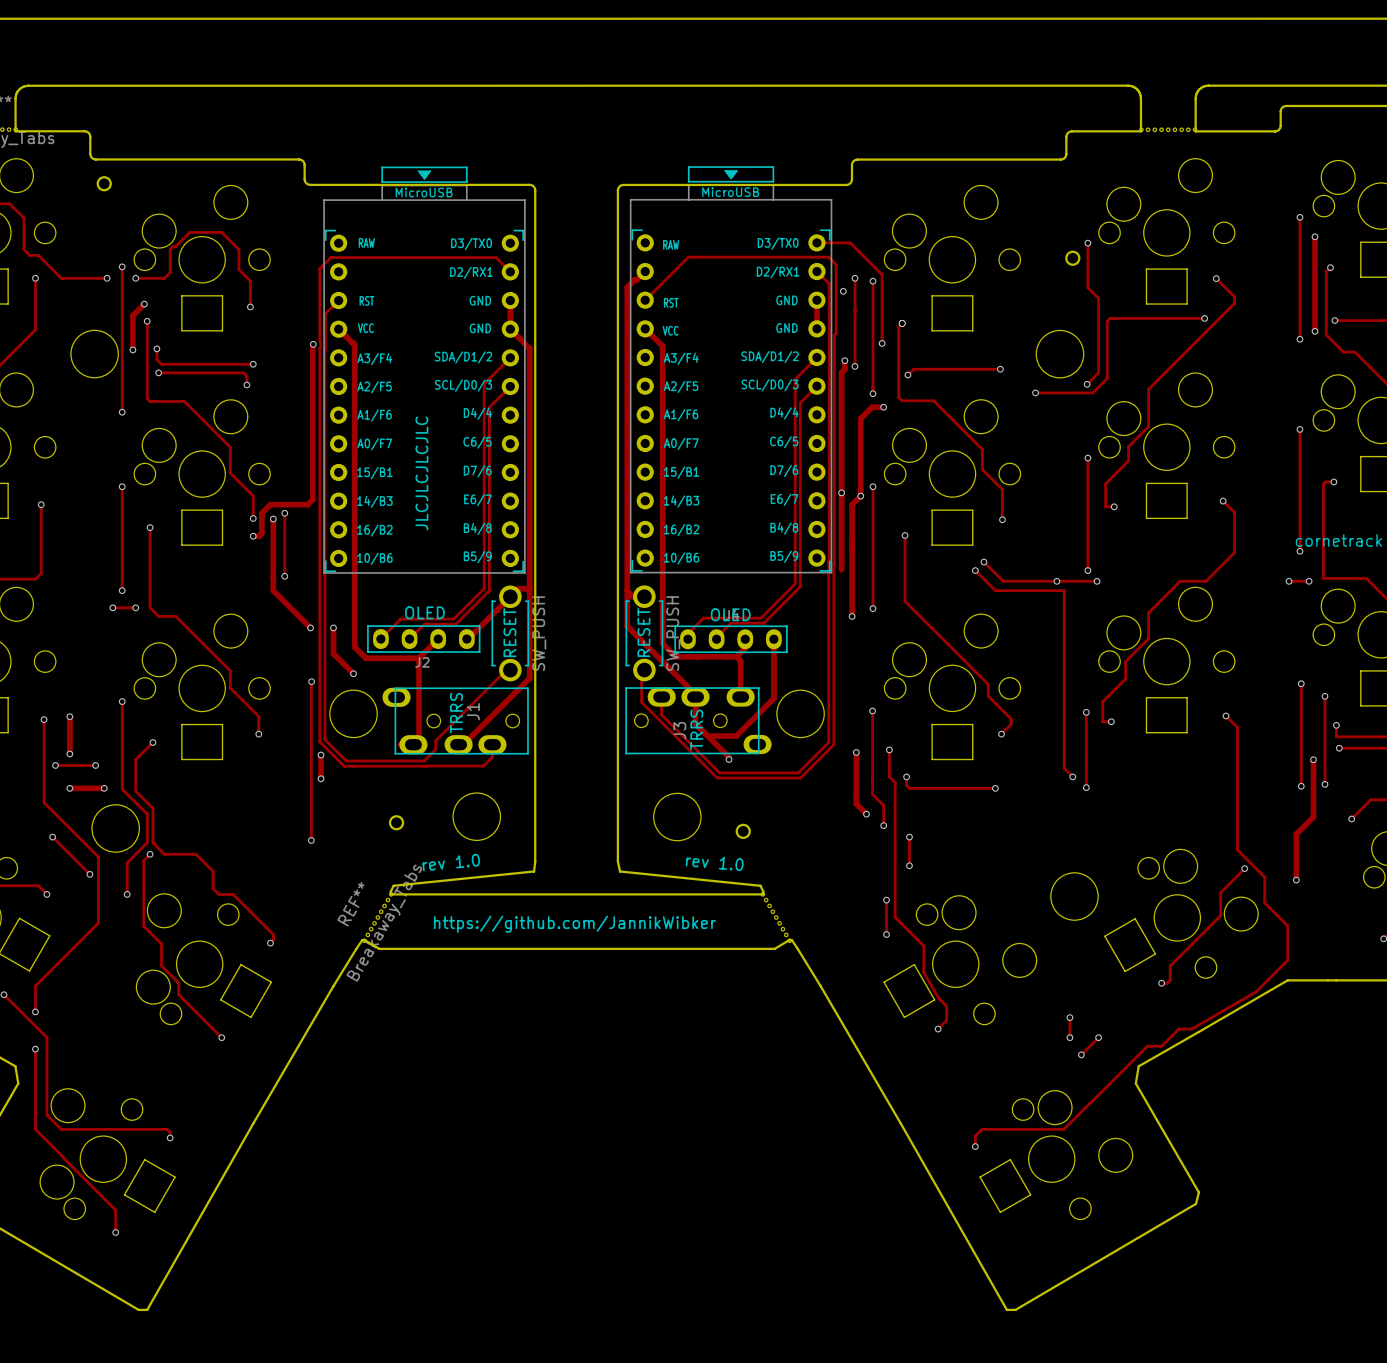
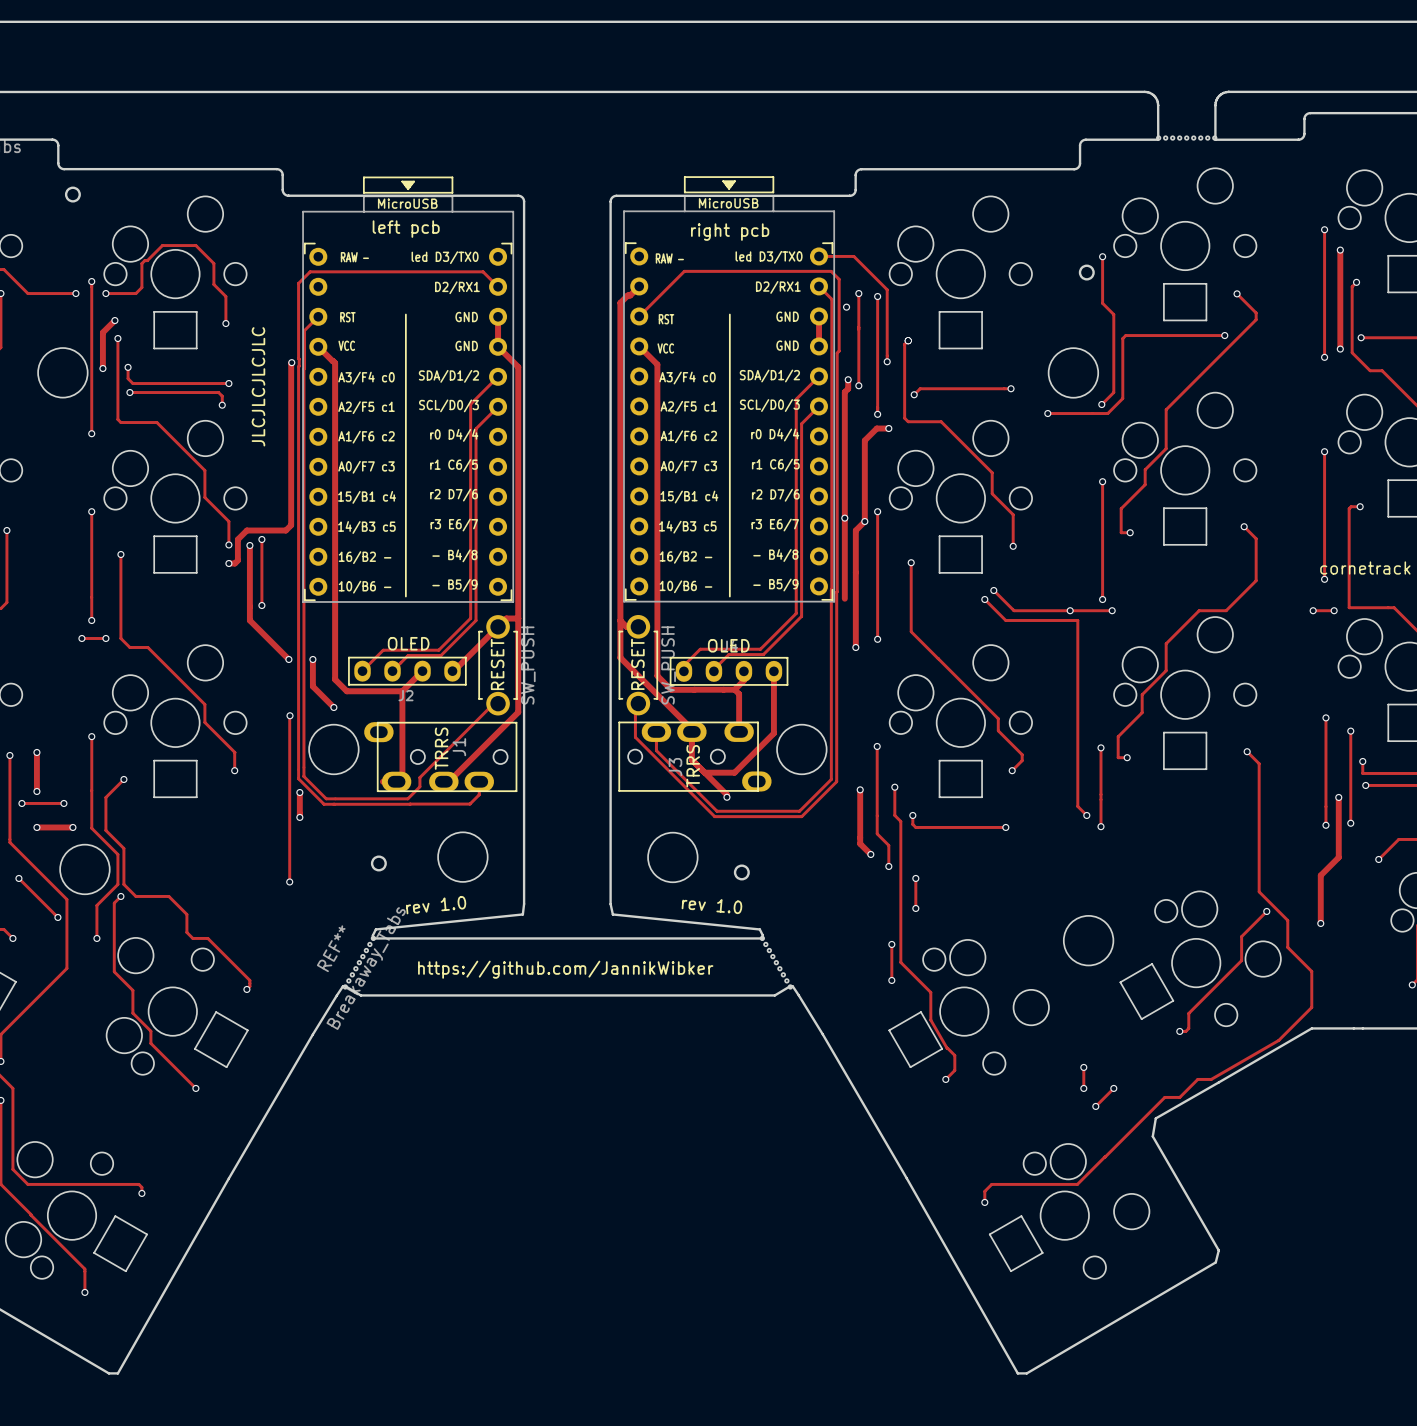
part footprint: [323, 166, 526, 574] -> [302, 176, 515, 603]
part footprint: [629, 166, 833, 574] -> [623, 176, 836, 603]
text: none -> left pcb (406, 229)
text: none -> right pcb (730, 232)
line: none -> (405, 314) (405, 596)
line: none -> (729, 314) (729, 596)
text position: JLCJLCJLCJLC (421, 473) -> JLCJLCJLCJLC (258, 386)

